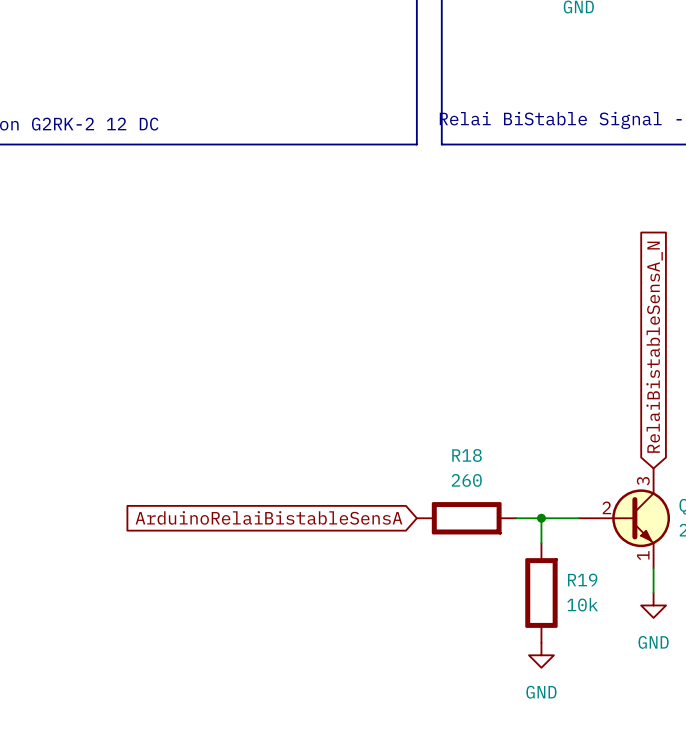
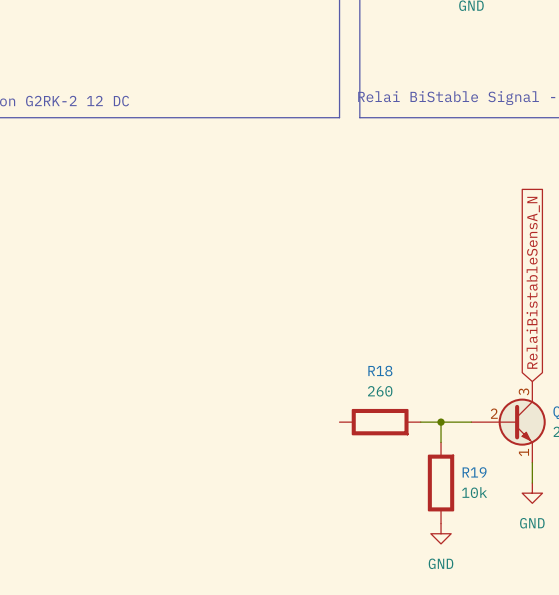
global label: ArduinoRelaiBistableSensA (268, 517) -> none

